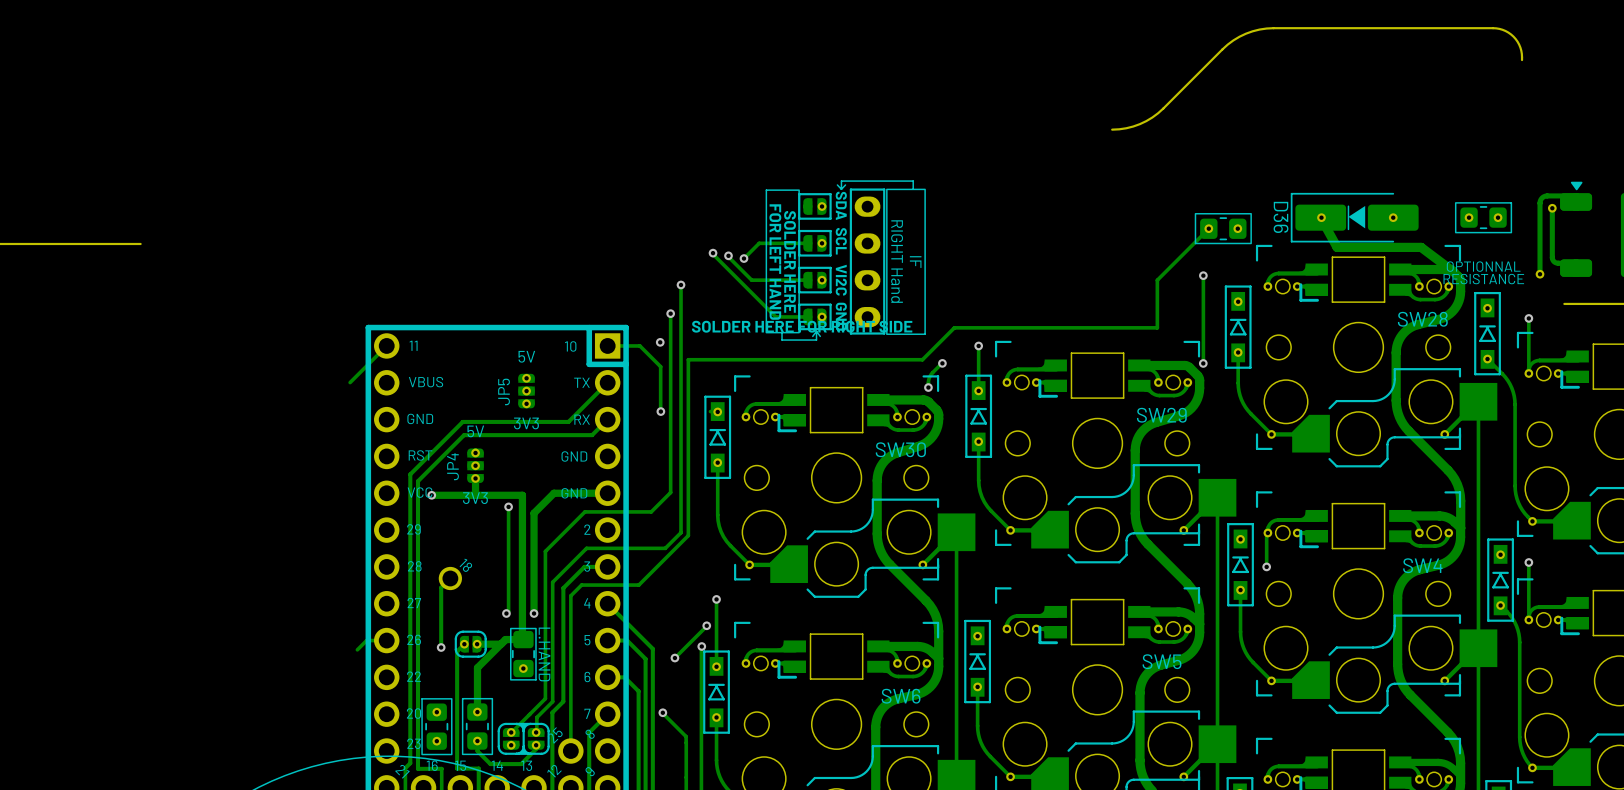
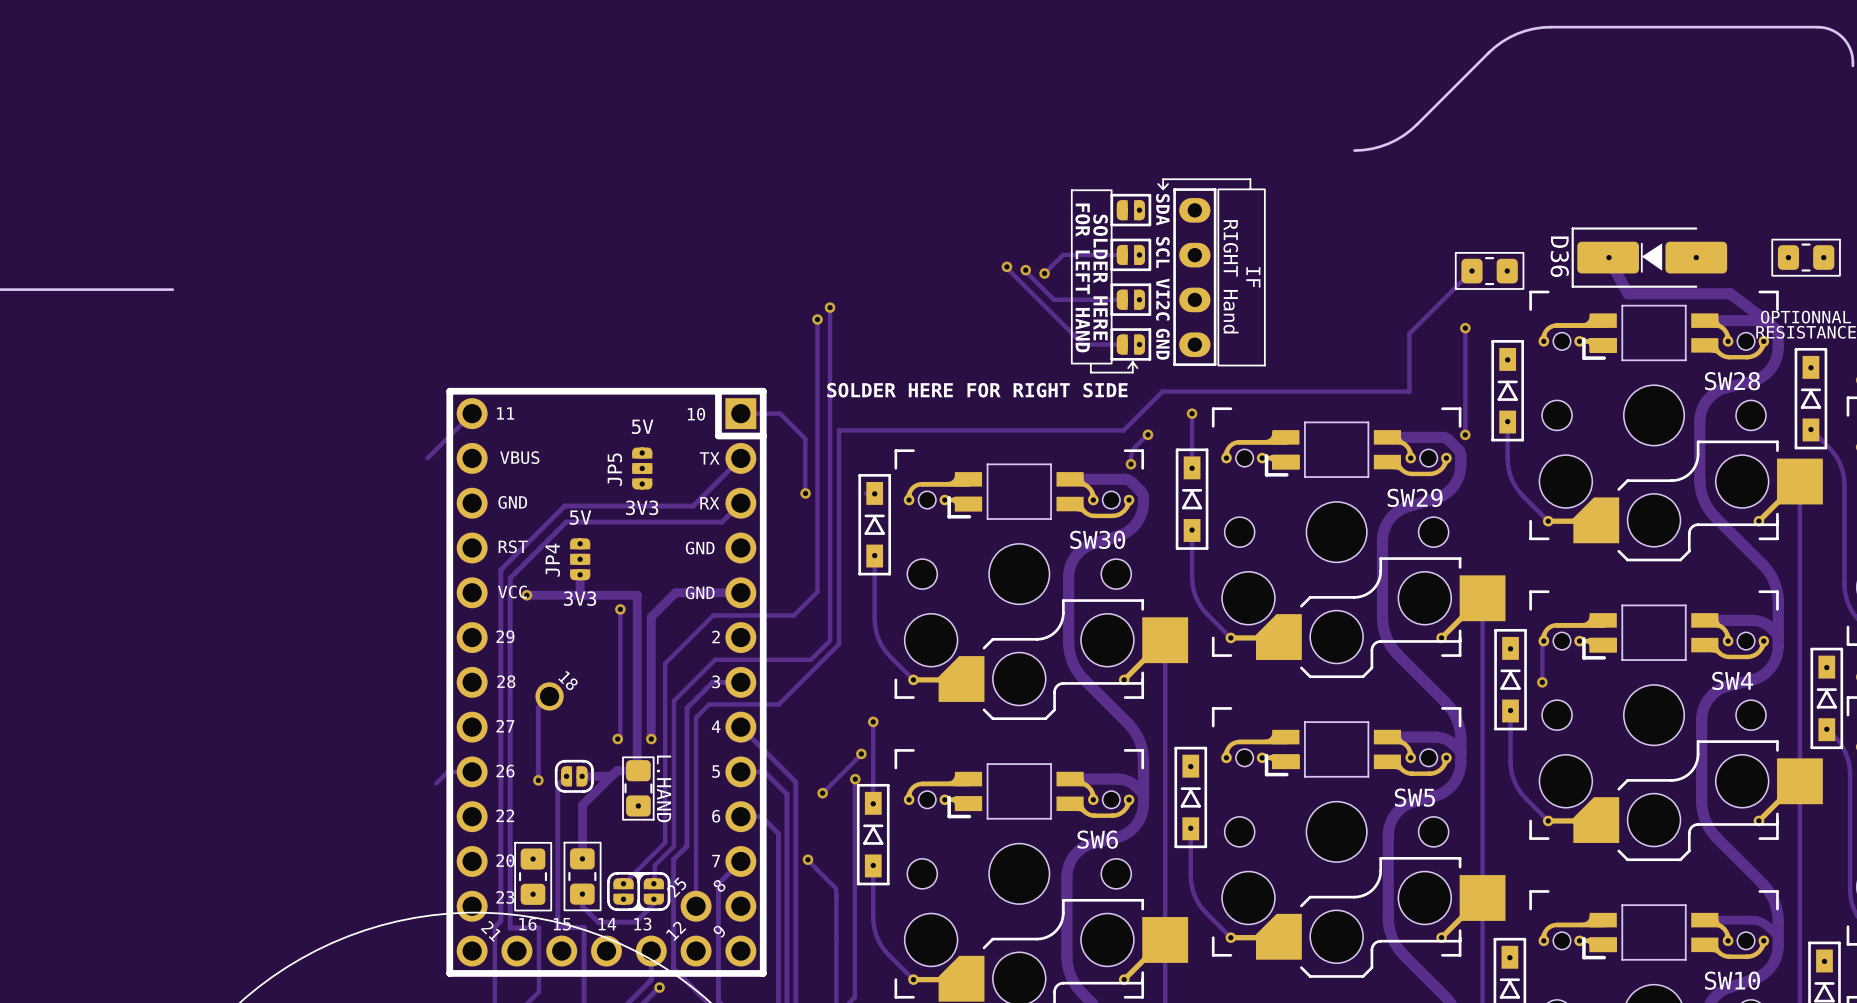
via: none -> (1006, 266)
via: none -> (1025, 270)
via: none -> (1044, 273)
track: (807, 243) (759, 243) (743, 258) -> (1122, 254) (1063, 254) (1044, 273)
track: (713, 253) (775, 316) (807, 316) -> (1006, 266) (1083, 344) (1122, 344)
via: (713, 253) -> none
track: (728, 255) (751, 280) (807, 280) -> (1025, 270) (1054, 299) (1122, 299)
via: (728, 255) -> none
part position: (881, 257) -> (1211, 272)
track: none -> (830, 307) (830, 339)
via: none -> (830, 307)
via: (743, 258) -> none
part position: (798, 265) -> (1111, 281)
via: none -> (817, 319)
track: none -> (821, 319) (817, 319) (817, 374)
via: (681, 284) -> none
via: (670, 313) -> none
via: (660, 342) -> none

